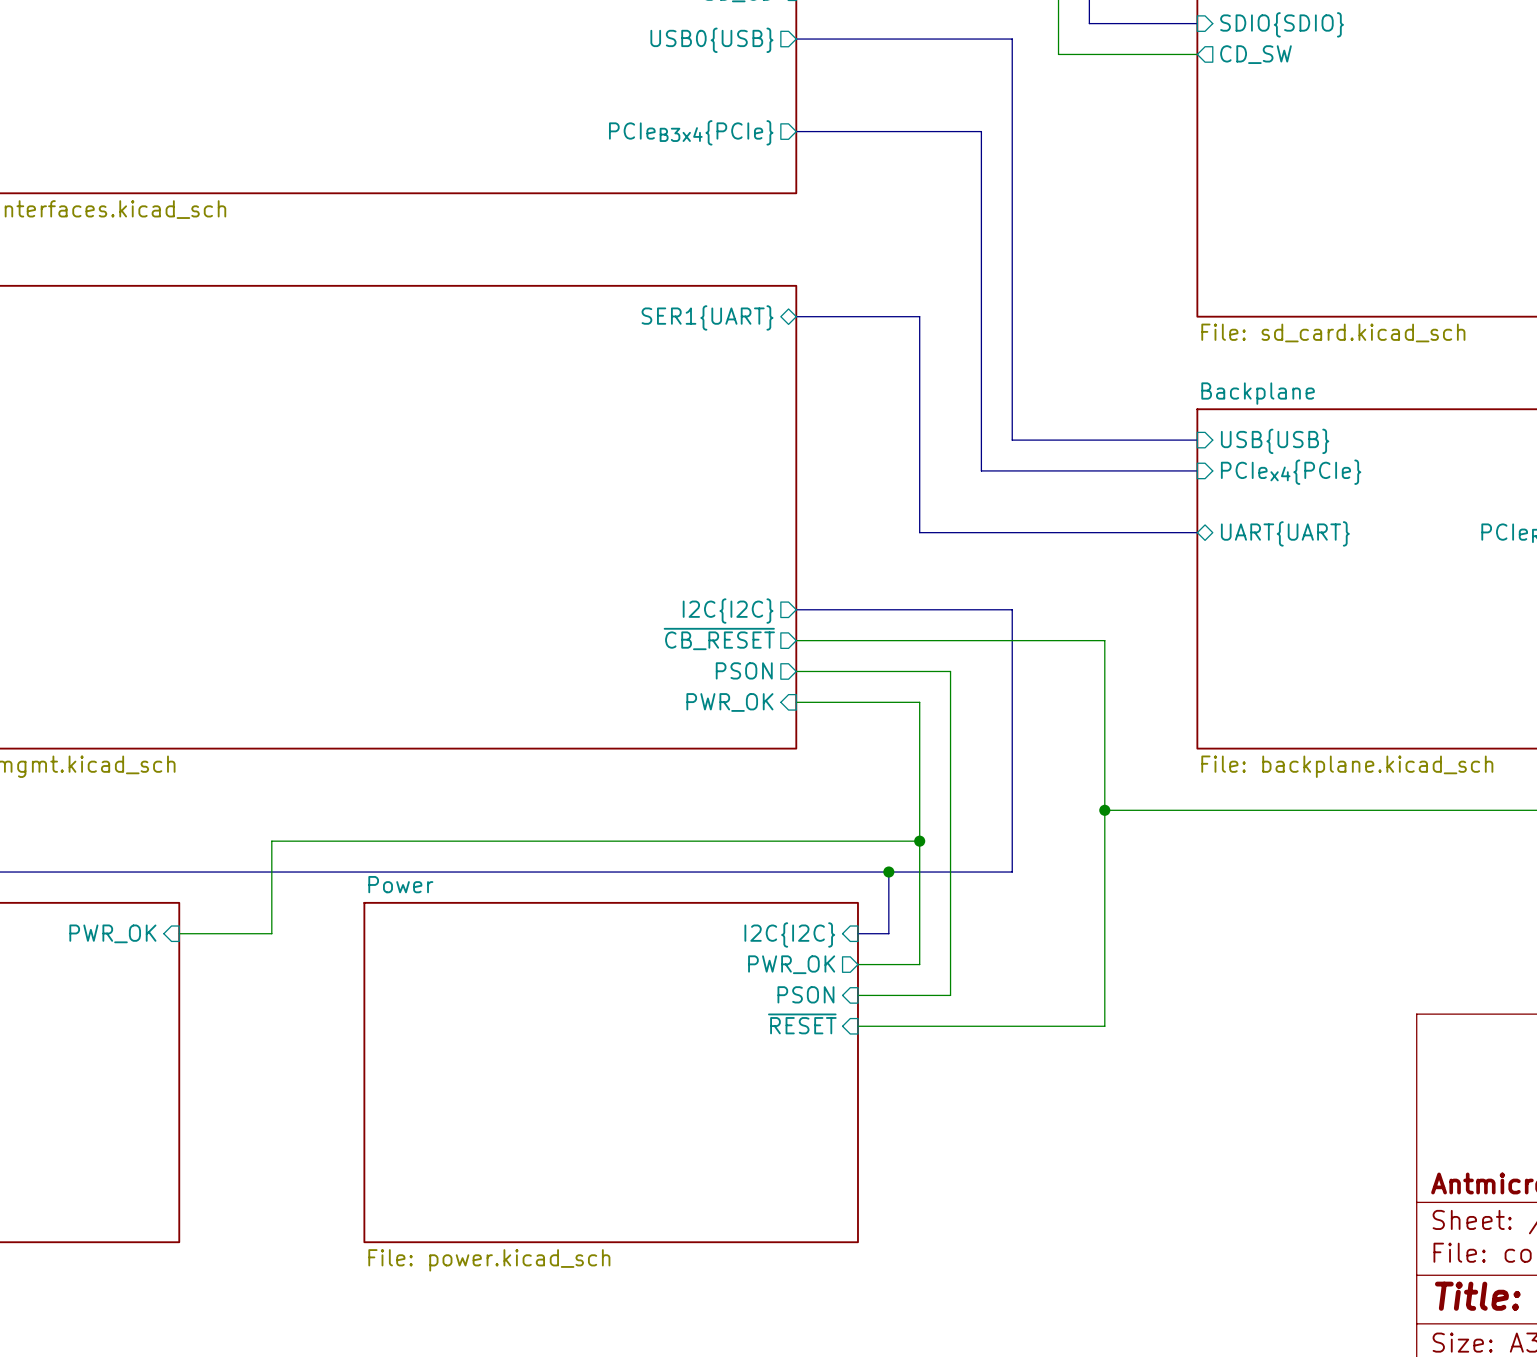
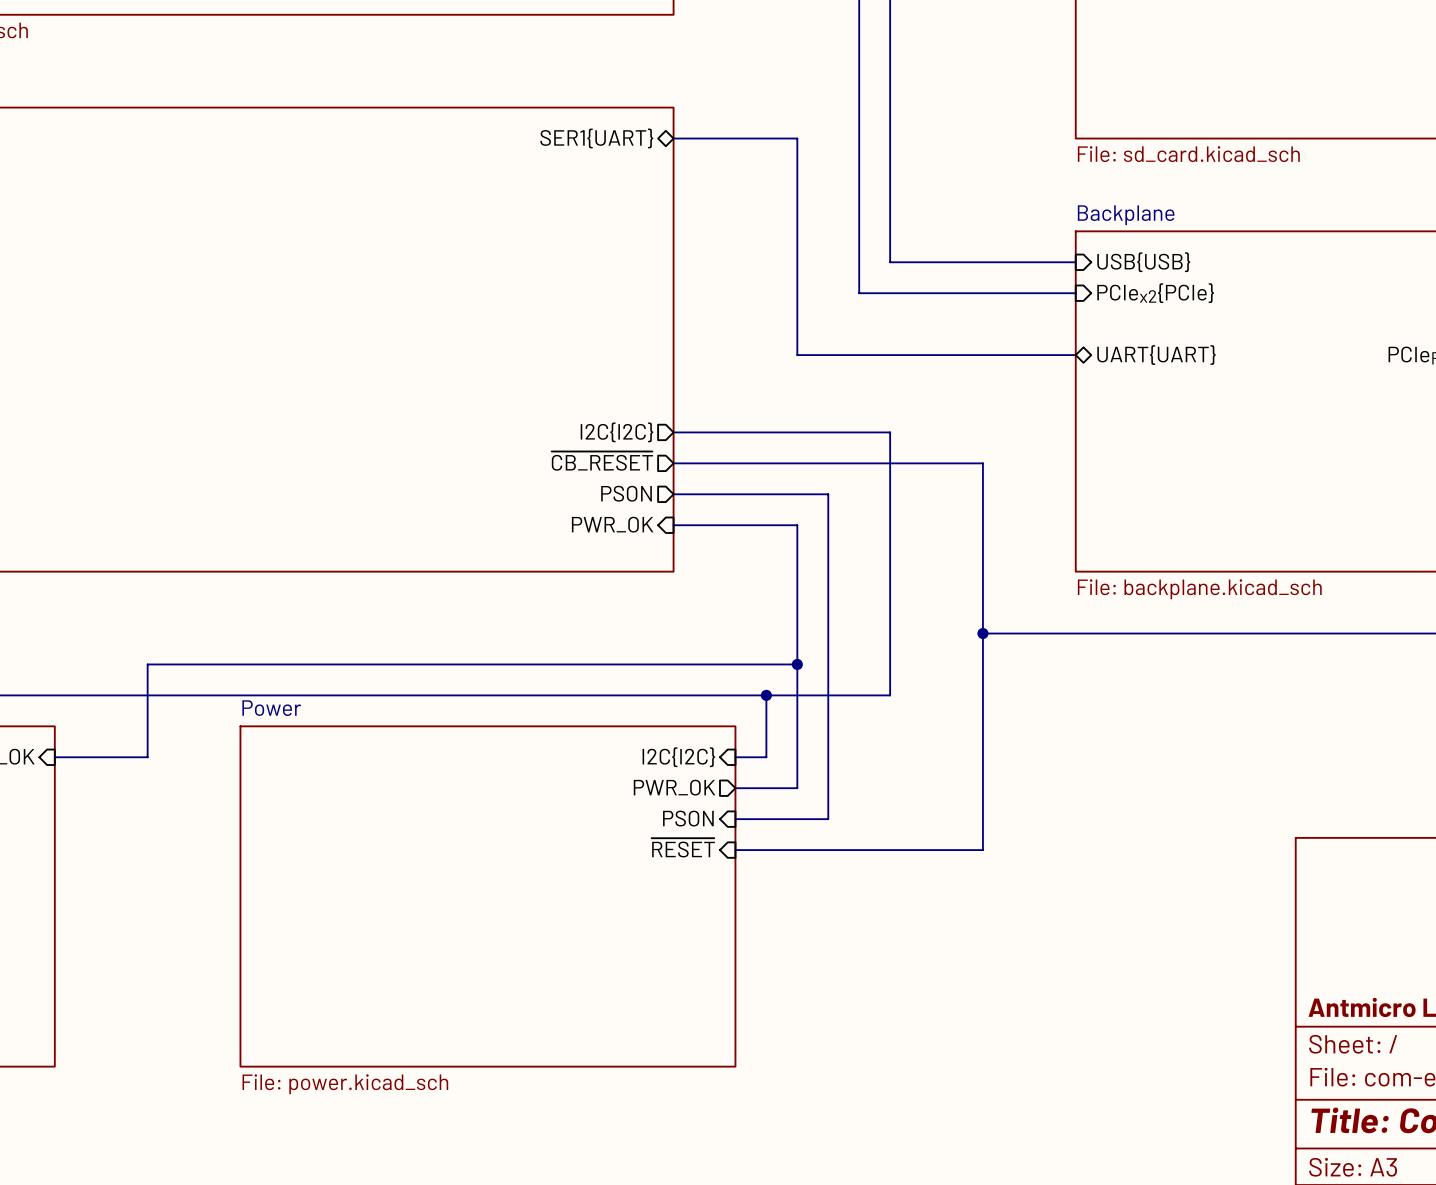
sheet pin: PCIex4{PCIe} (1291, 472) -> PCIex2{PCIe} (1155, 293)

